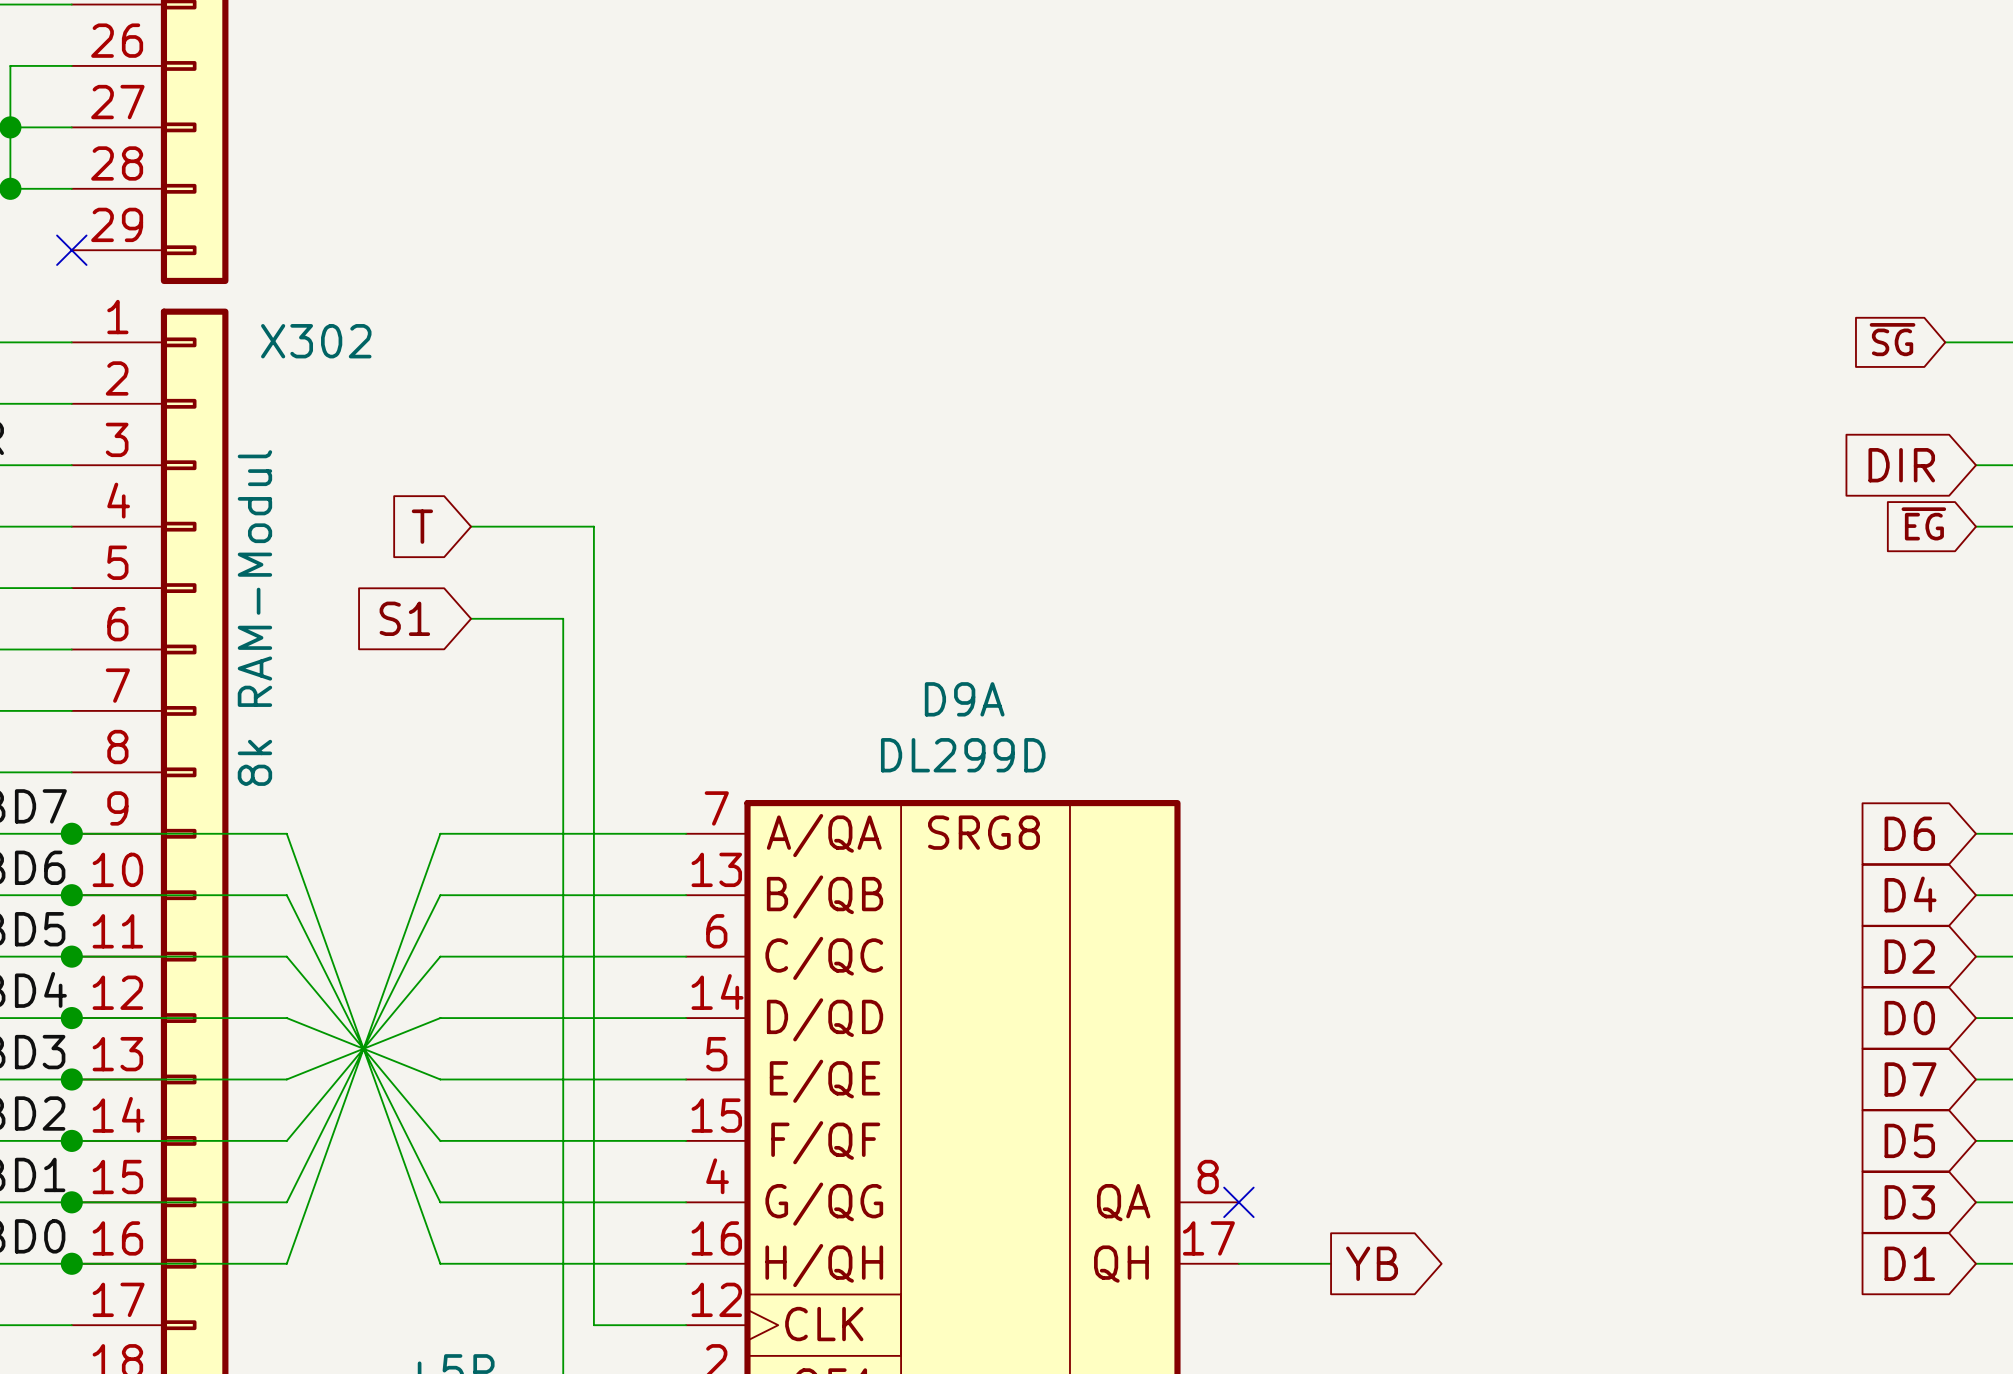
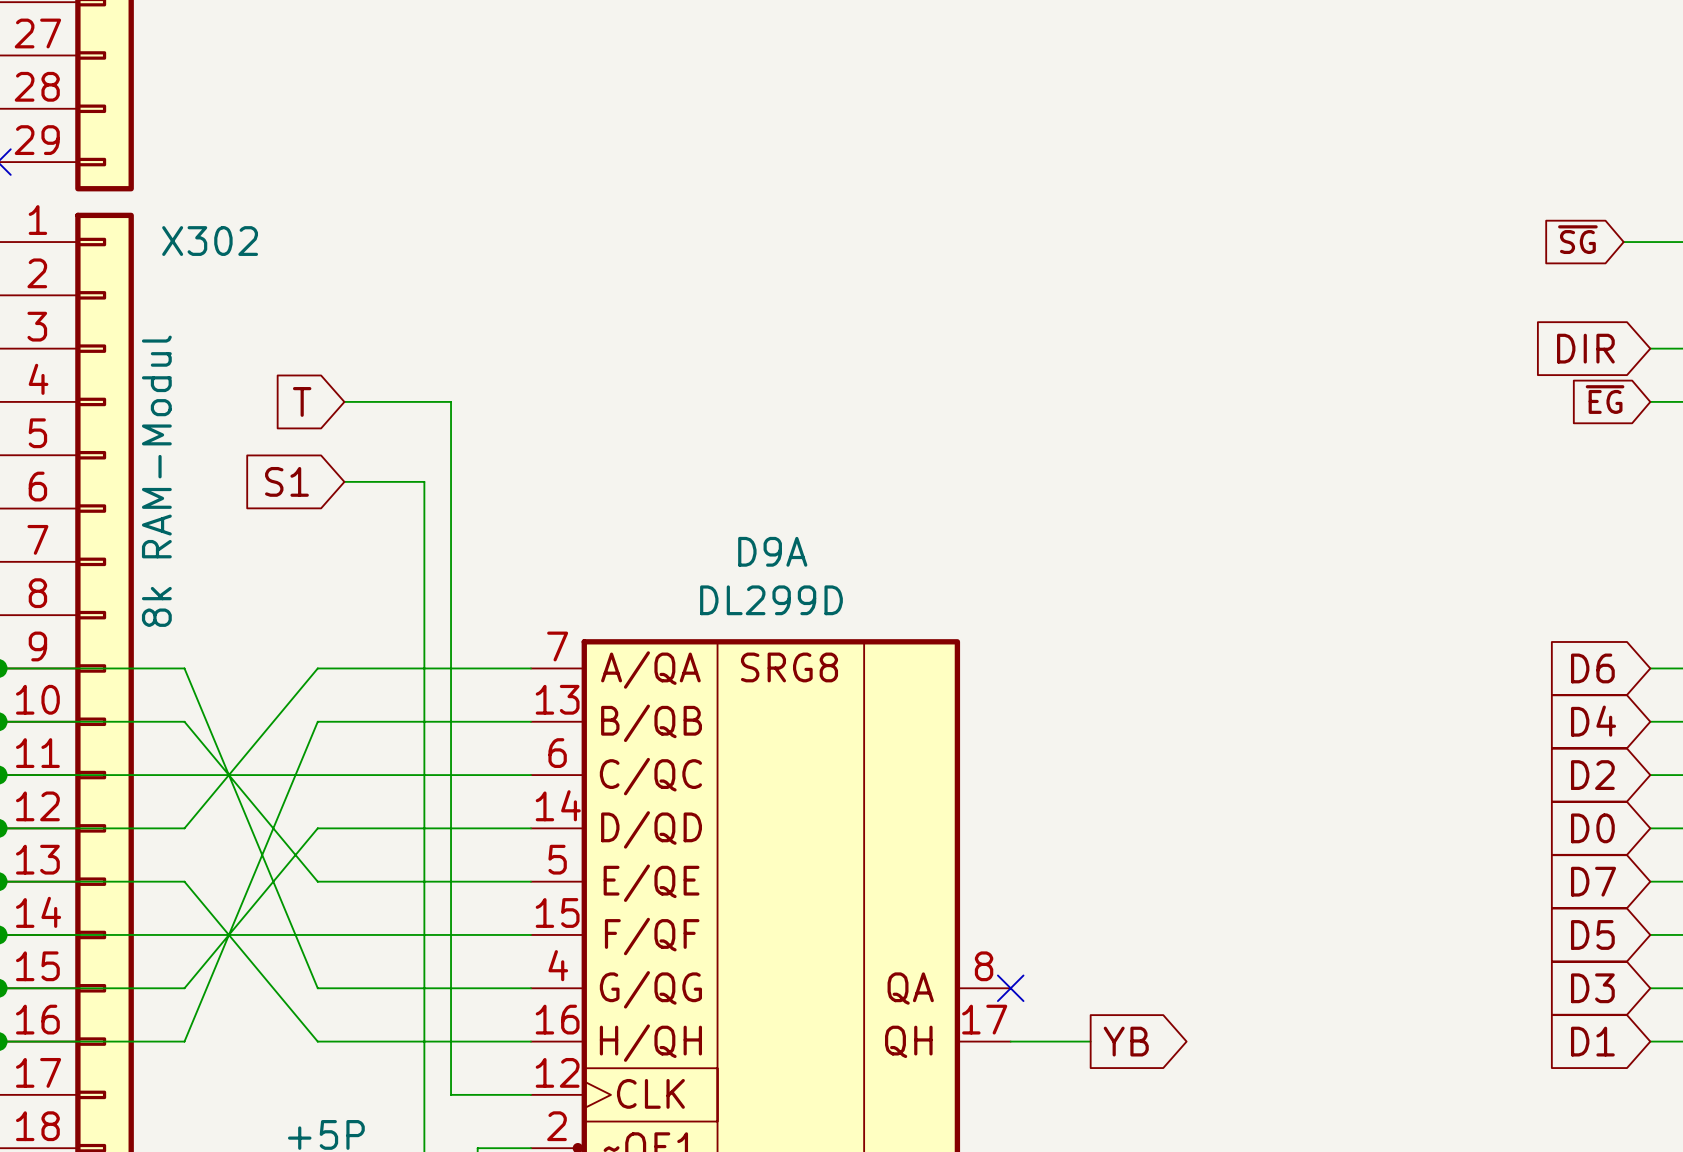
wire: (286, 833) (440, 1263) -> (184, 668) (317, 988)
wire: (440, 833) (286, 1263) -> (317, 668) (184, 828)
wire: (286, 895) (440, 1202) -> none
wire: (440, 895) (286, 1202) -> (317, 721) (184, 1041)
wire: (286, 956) (440, 1140) -> (184, 775) (317, 775)
wire: (440, 956) (286, 1140) -> (317, 934) (184, 934)
wire: (286, 1018) (440, 1079) -> (184, 721) (317, 881)
wire: (440, 1018) (286, 1079) -> (317, 828) (184, 988)
wire: none -> (184, 881) (317, 1041)

